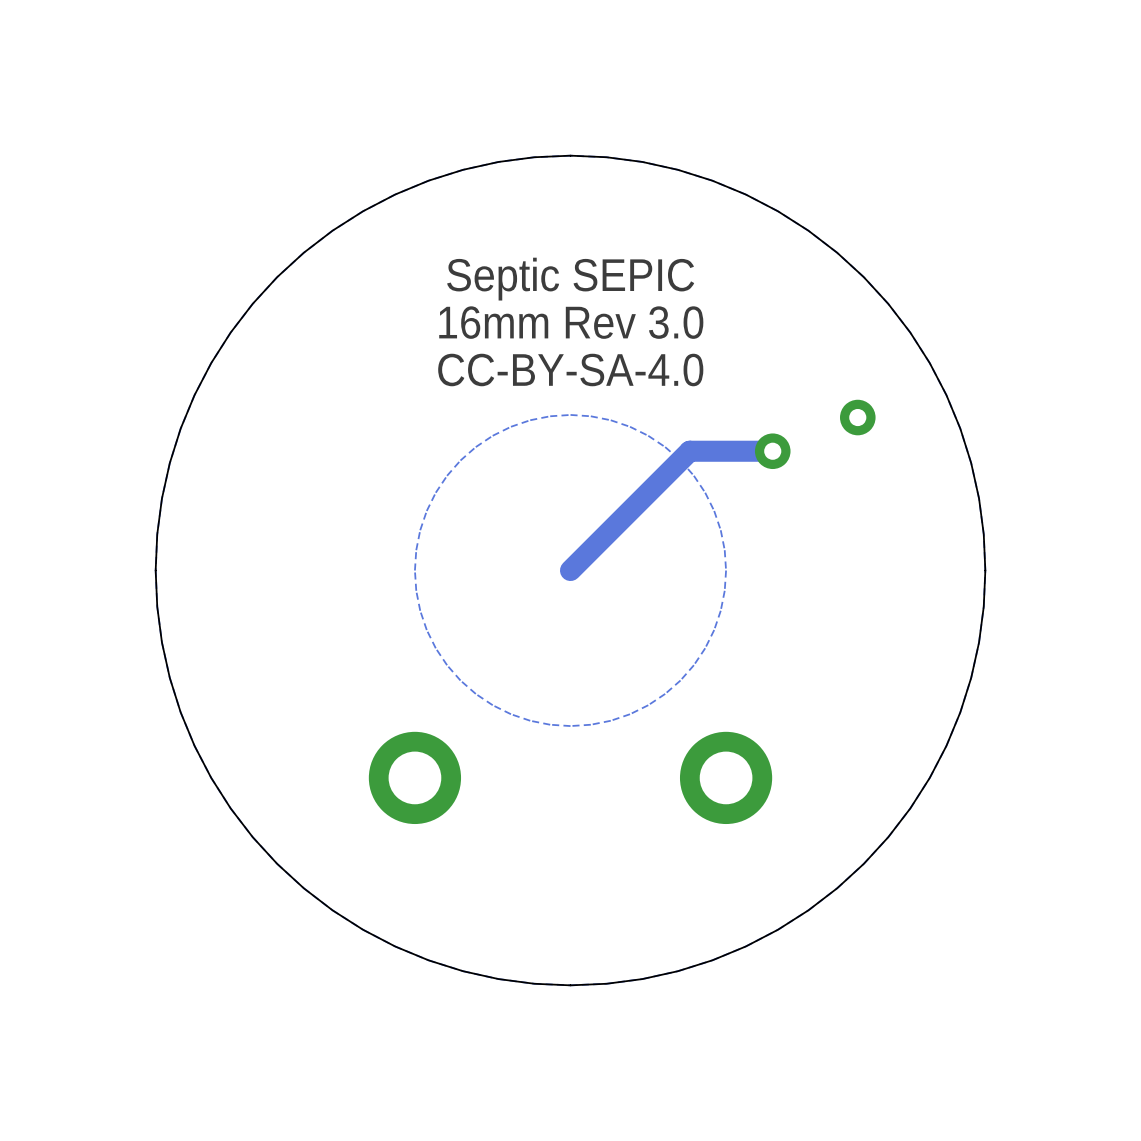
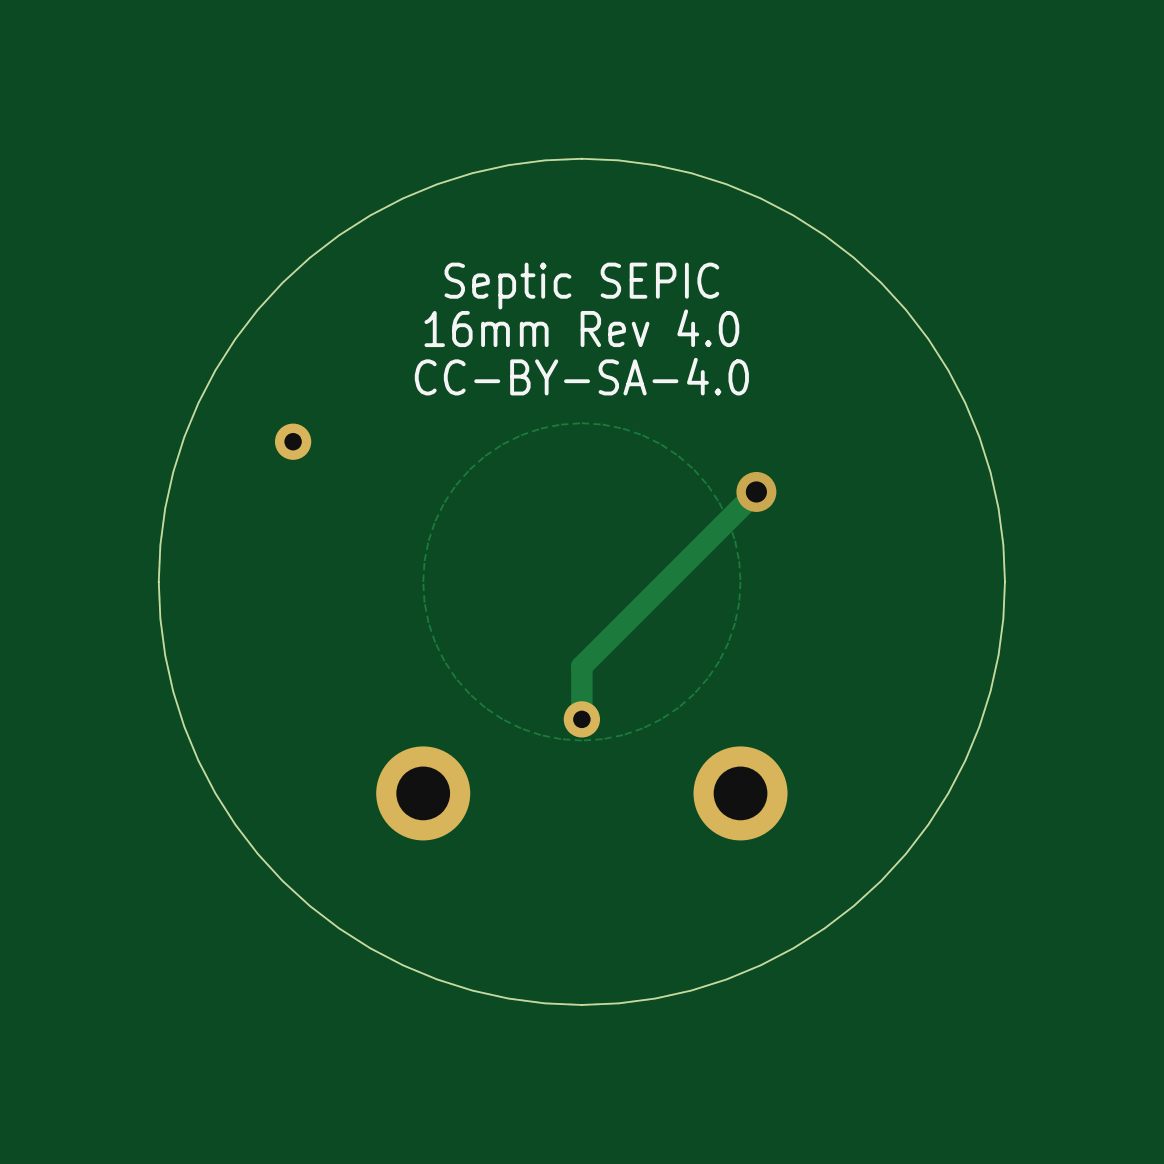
text: 16mm Rev 3.0 (571, 322) -> 16mm Rev 4.0 (581, 328)
part: (857, 417) -> none
part: none -> (293, 441)
track: (772, 451) (689, 451) (570, 570) -> none
part: (772, 451) -> none
track: none -> (756, 491) (581, 666) (581, 719)
via: none -> (756, 491)
part: none -> (581, 719)

